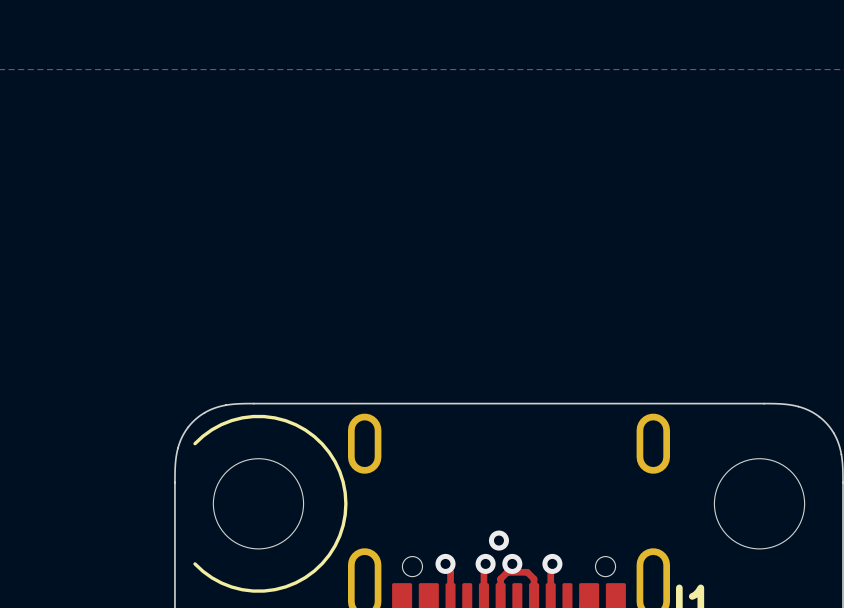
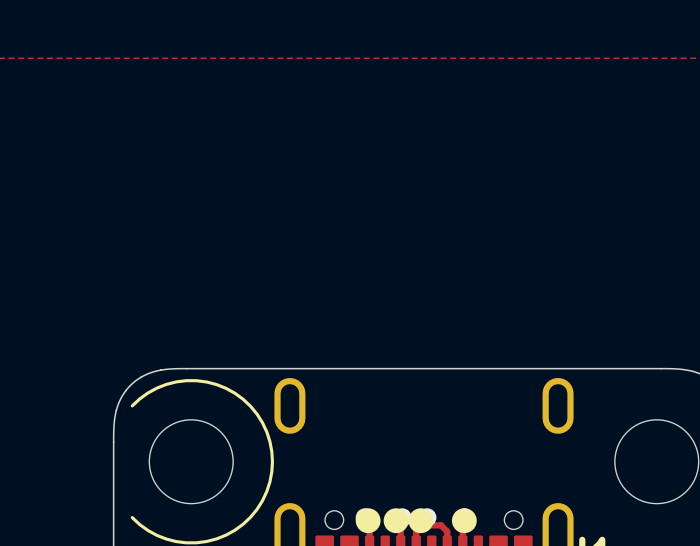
via: (498, 540) -> none
drawing: none -> [355, 508, 477, 534]

